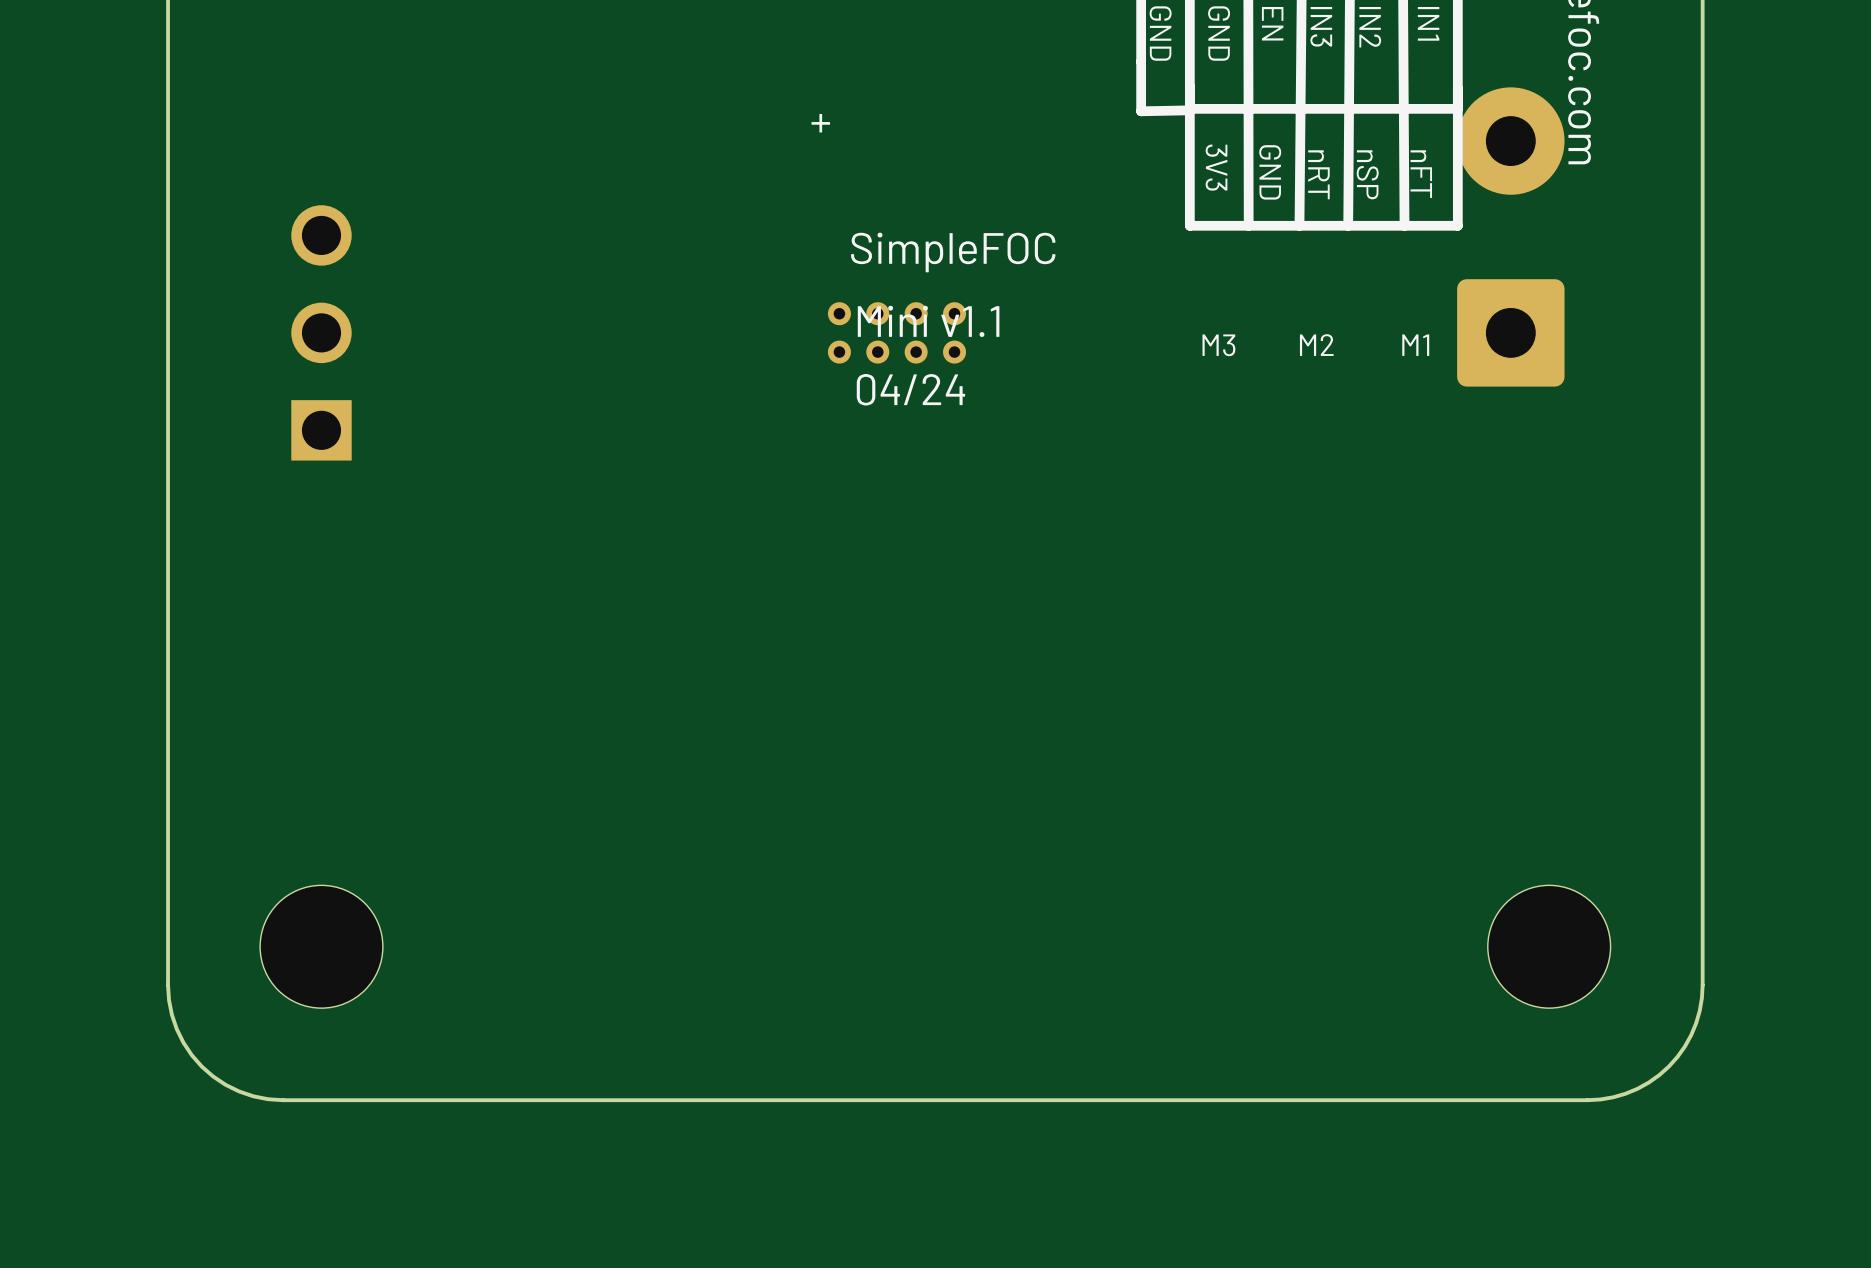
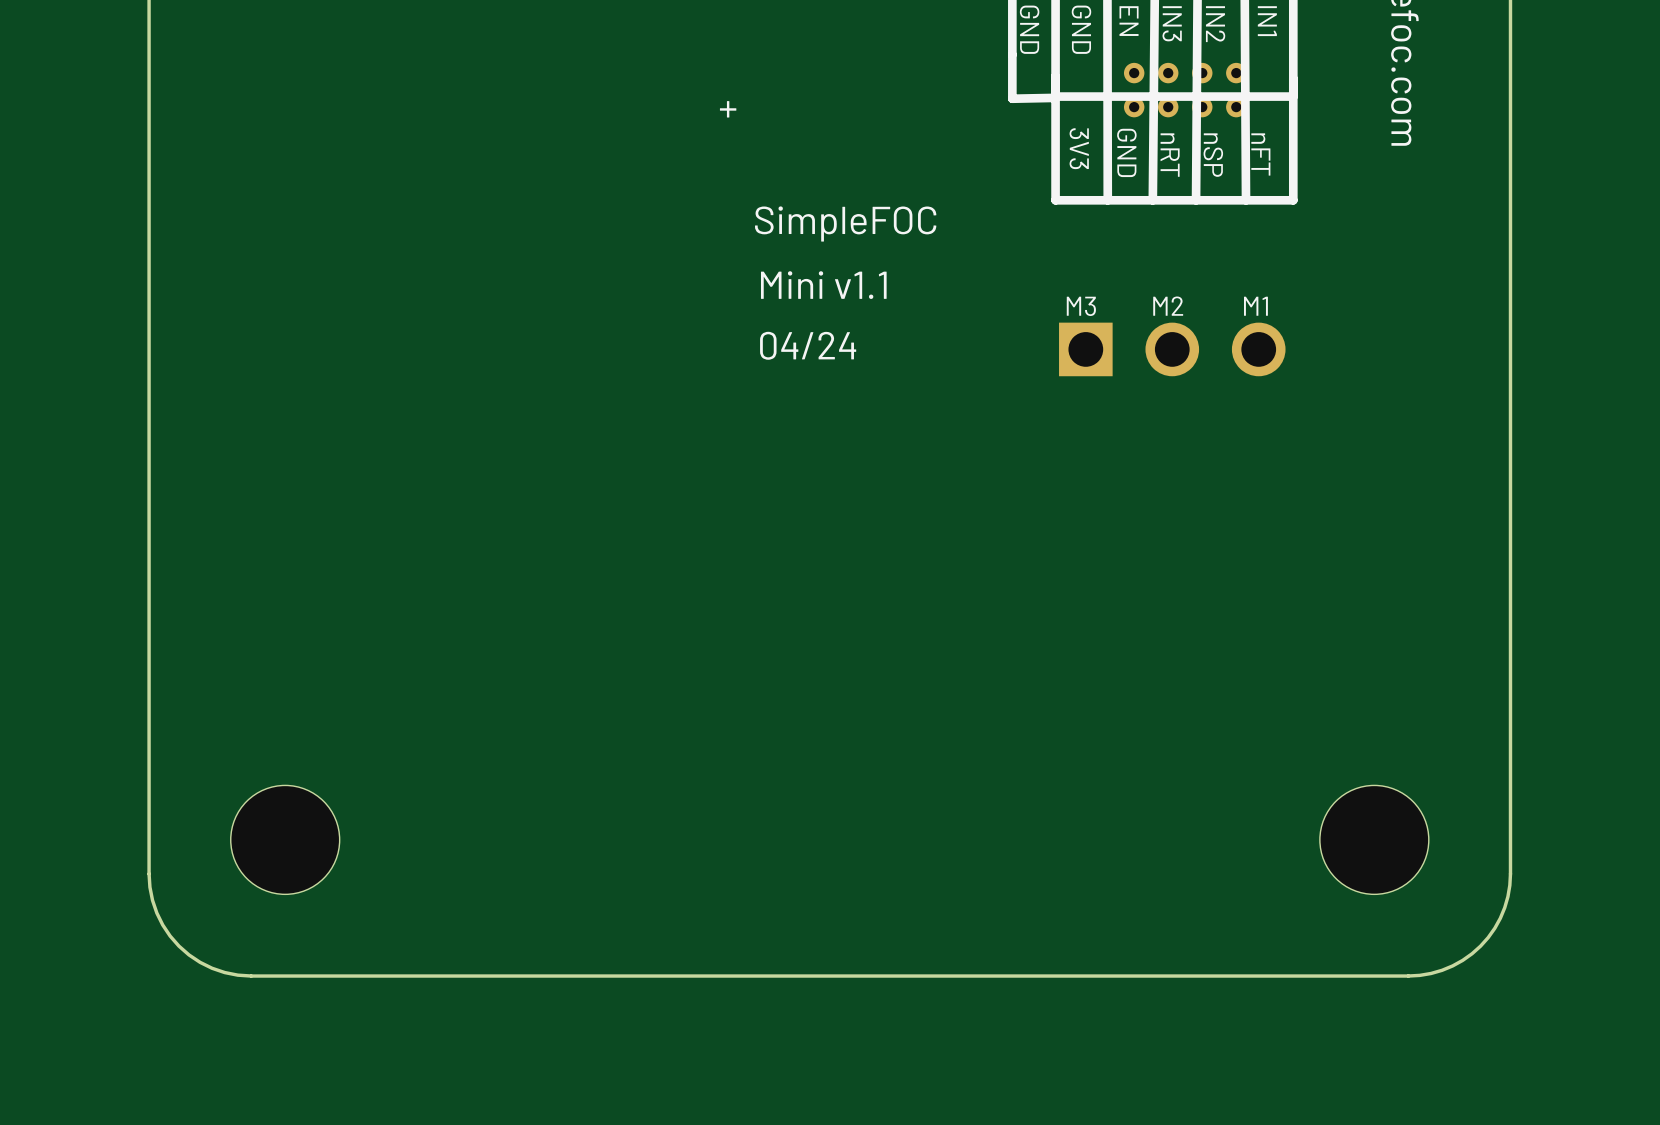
part: (1510, 236) -> none
part: (321, 332) -> none
part position: (896, 332) -> (1185, 90)
part: none -> (1172, 349)

